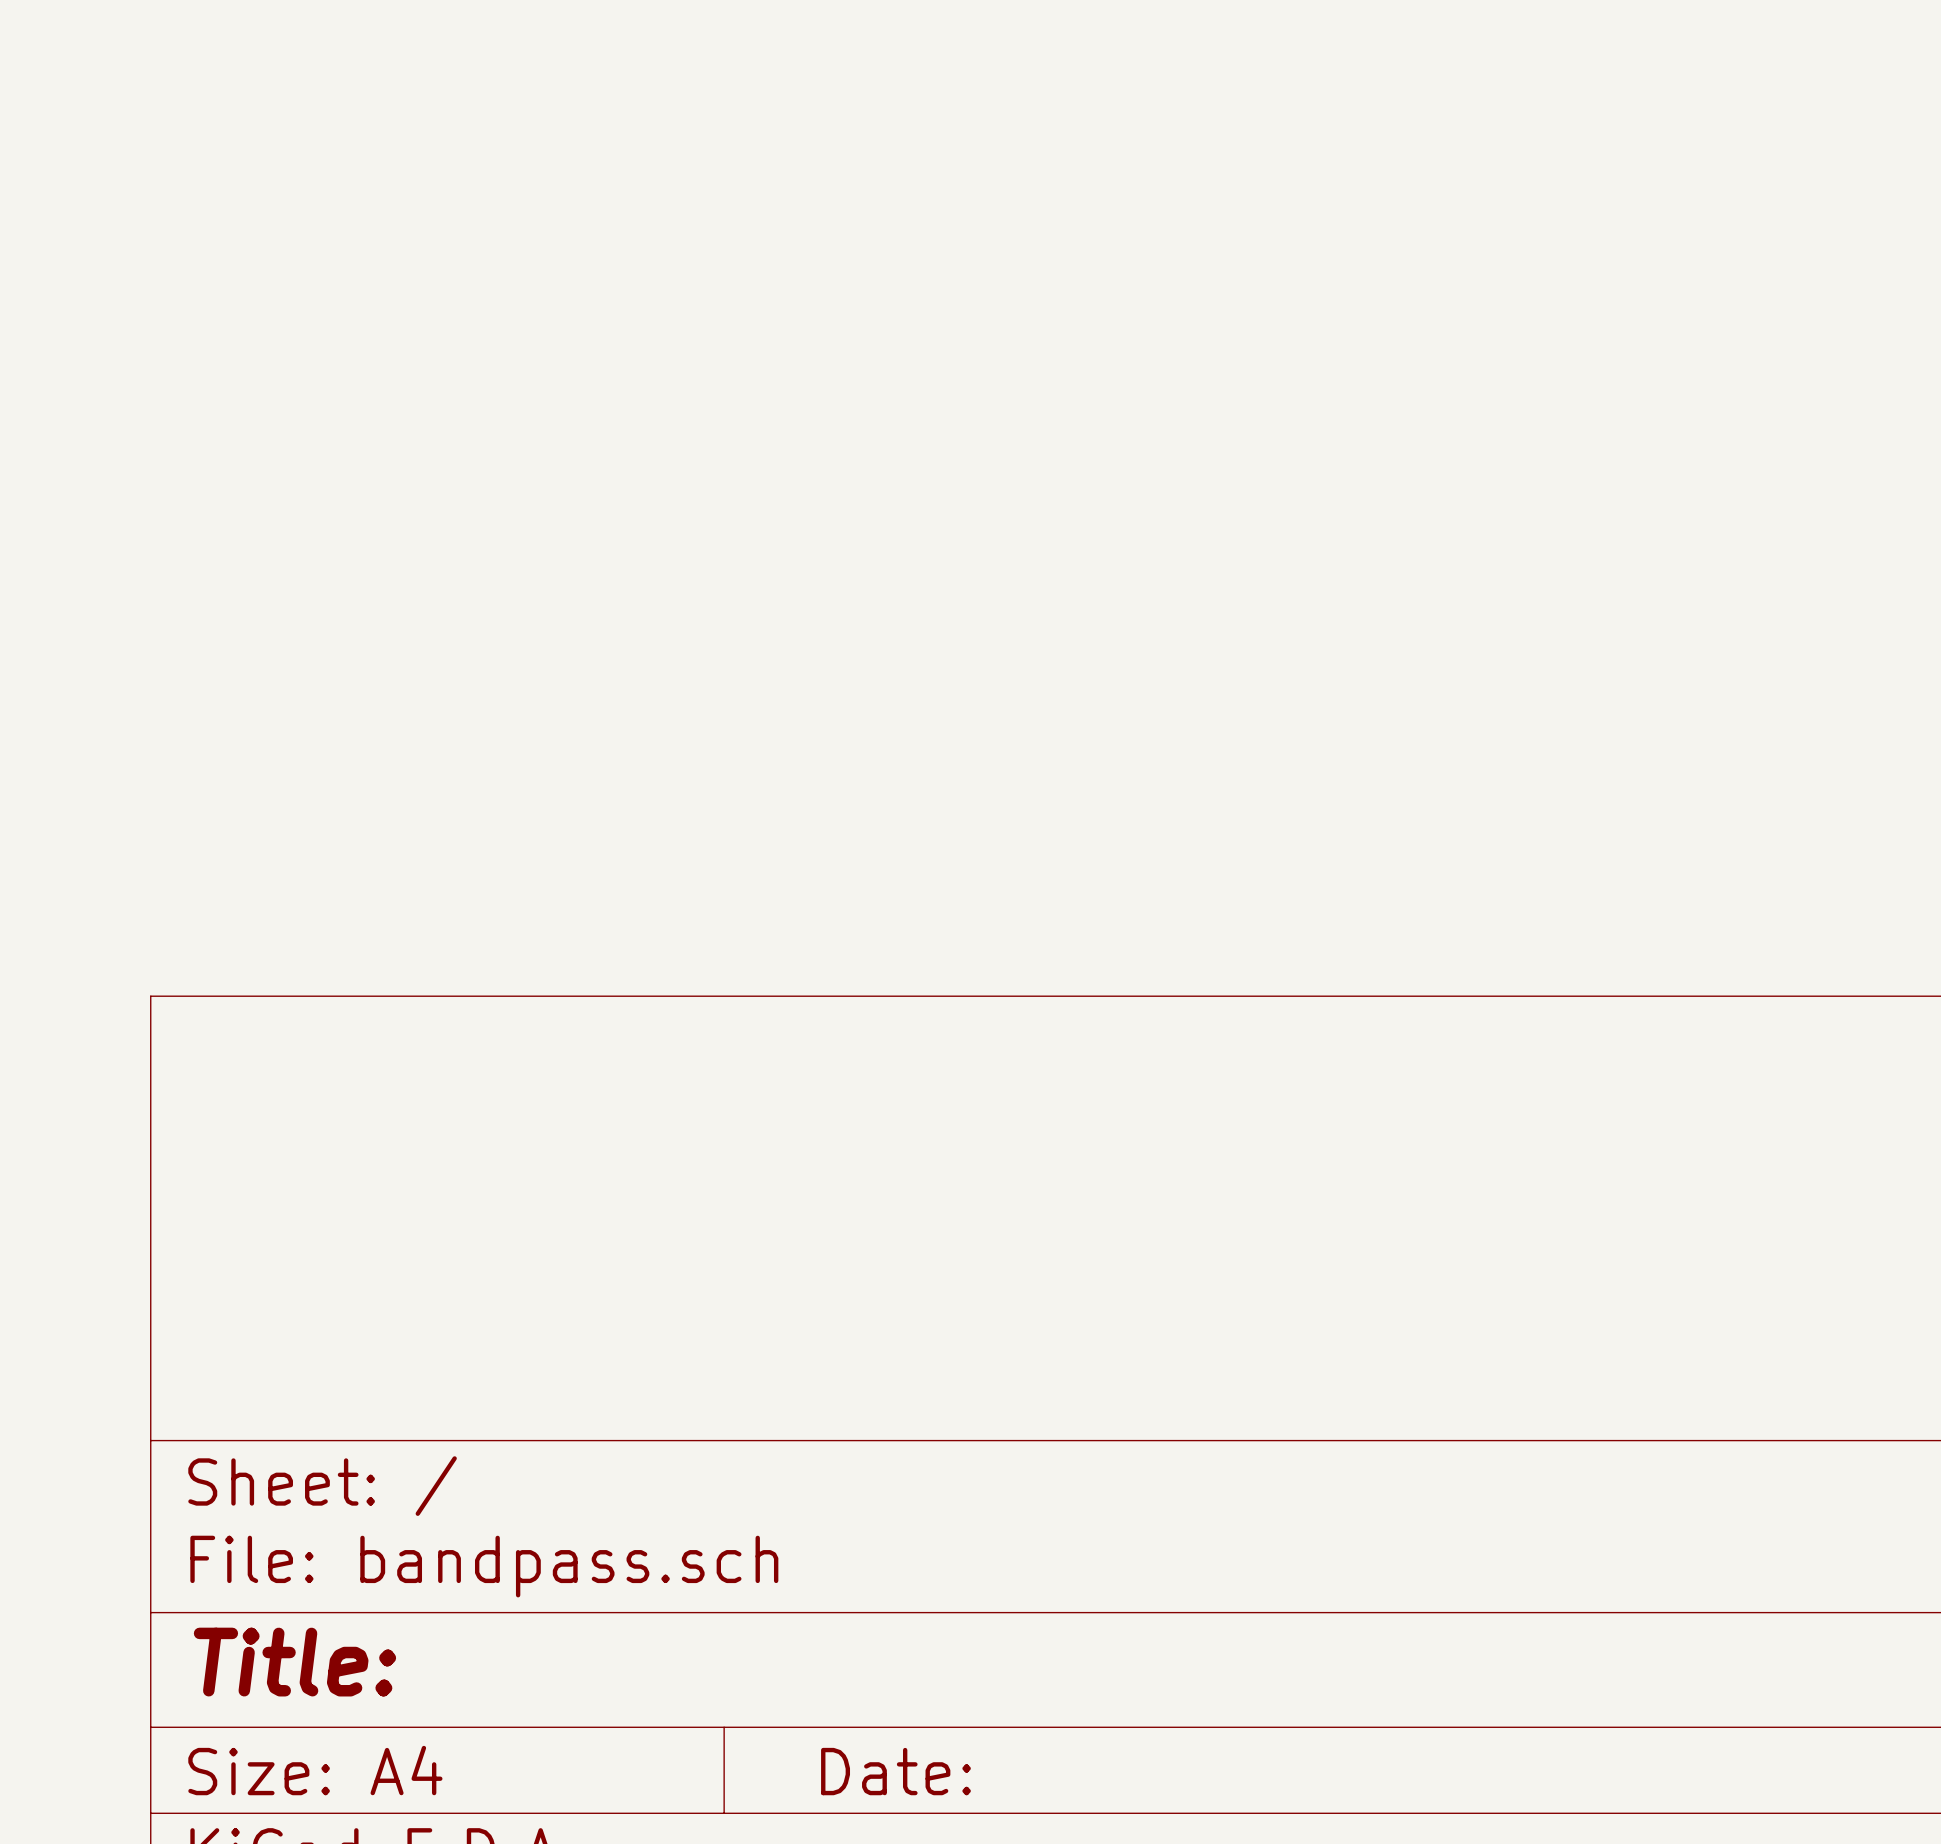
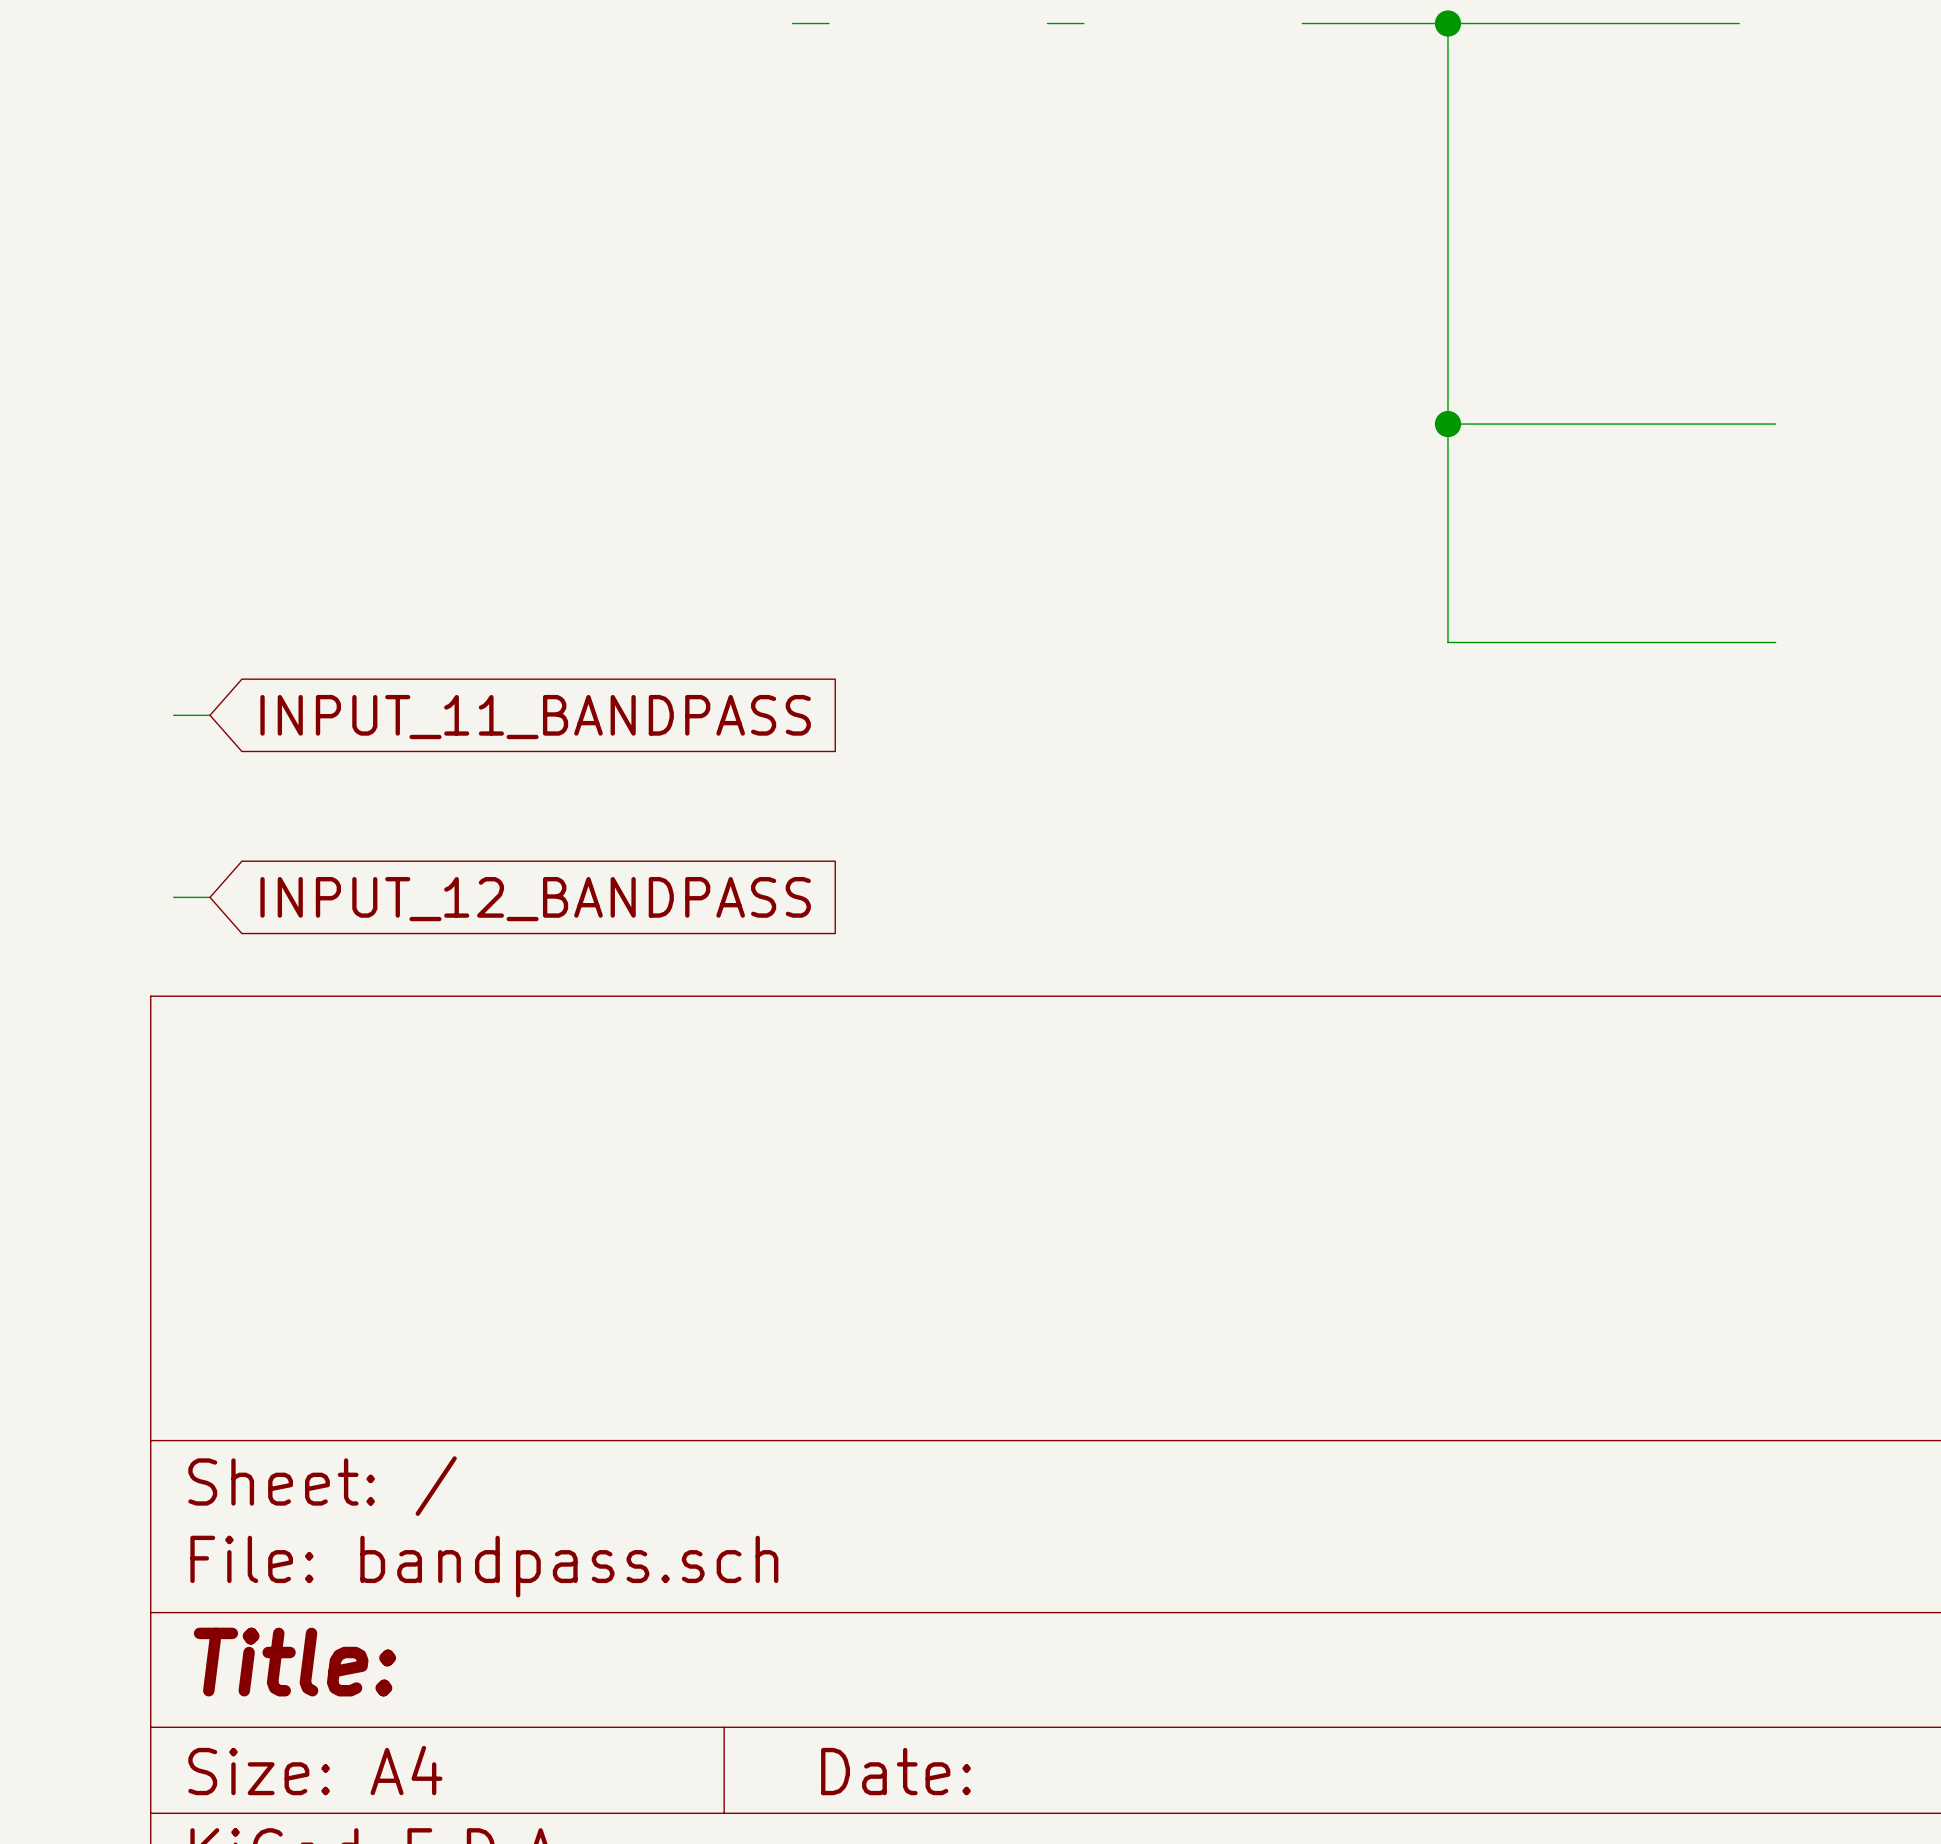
wire: none -> (792, 23) (829, 23)
wire: none -> (1047, 23) (1083, 23)
wire: none -> (1302, 23) (1739, 23)
wire: none -> (1447, 23) (1447, 642) (1775, 642)
junction: none -> (1447, 23)
wire: none -> (1447, 424) (1775, 424)
junction: none -> (1447, 424)
wire: none -> (173, 715) (210, 715)
global label: none -> INPUT_11_BANDPASS (535, 717)
wire: none -> (173, 897) (210, 897)
global label: none -> INPUT_12_BANDPASS (535, 899)

